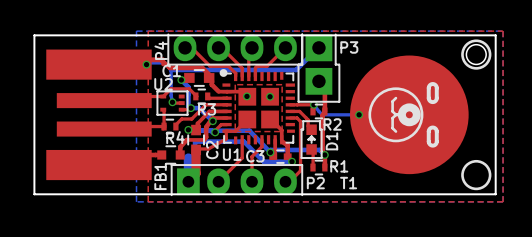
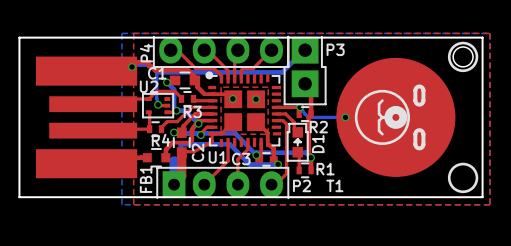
part footprint: [46, 49, 152, 181] -> [35, 56, 138, 179]

